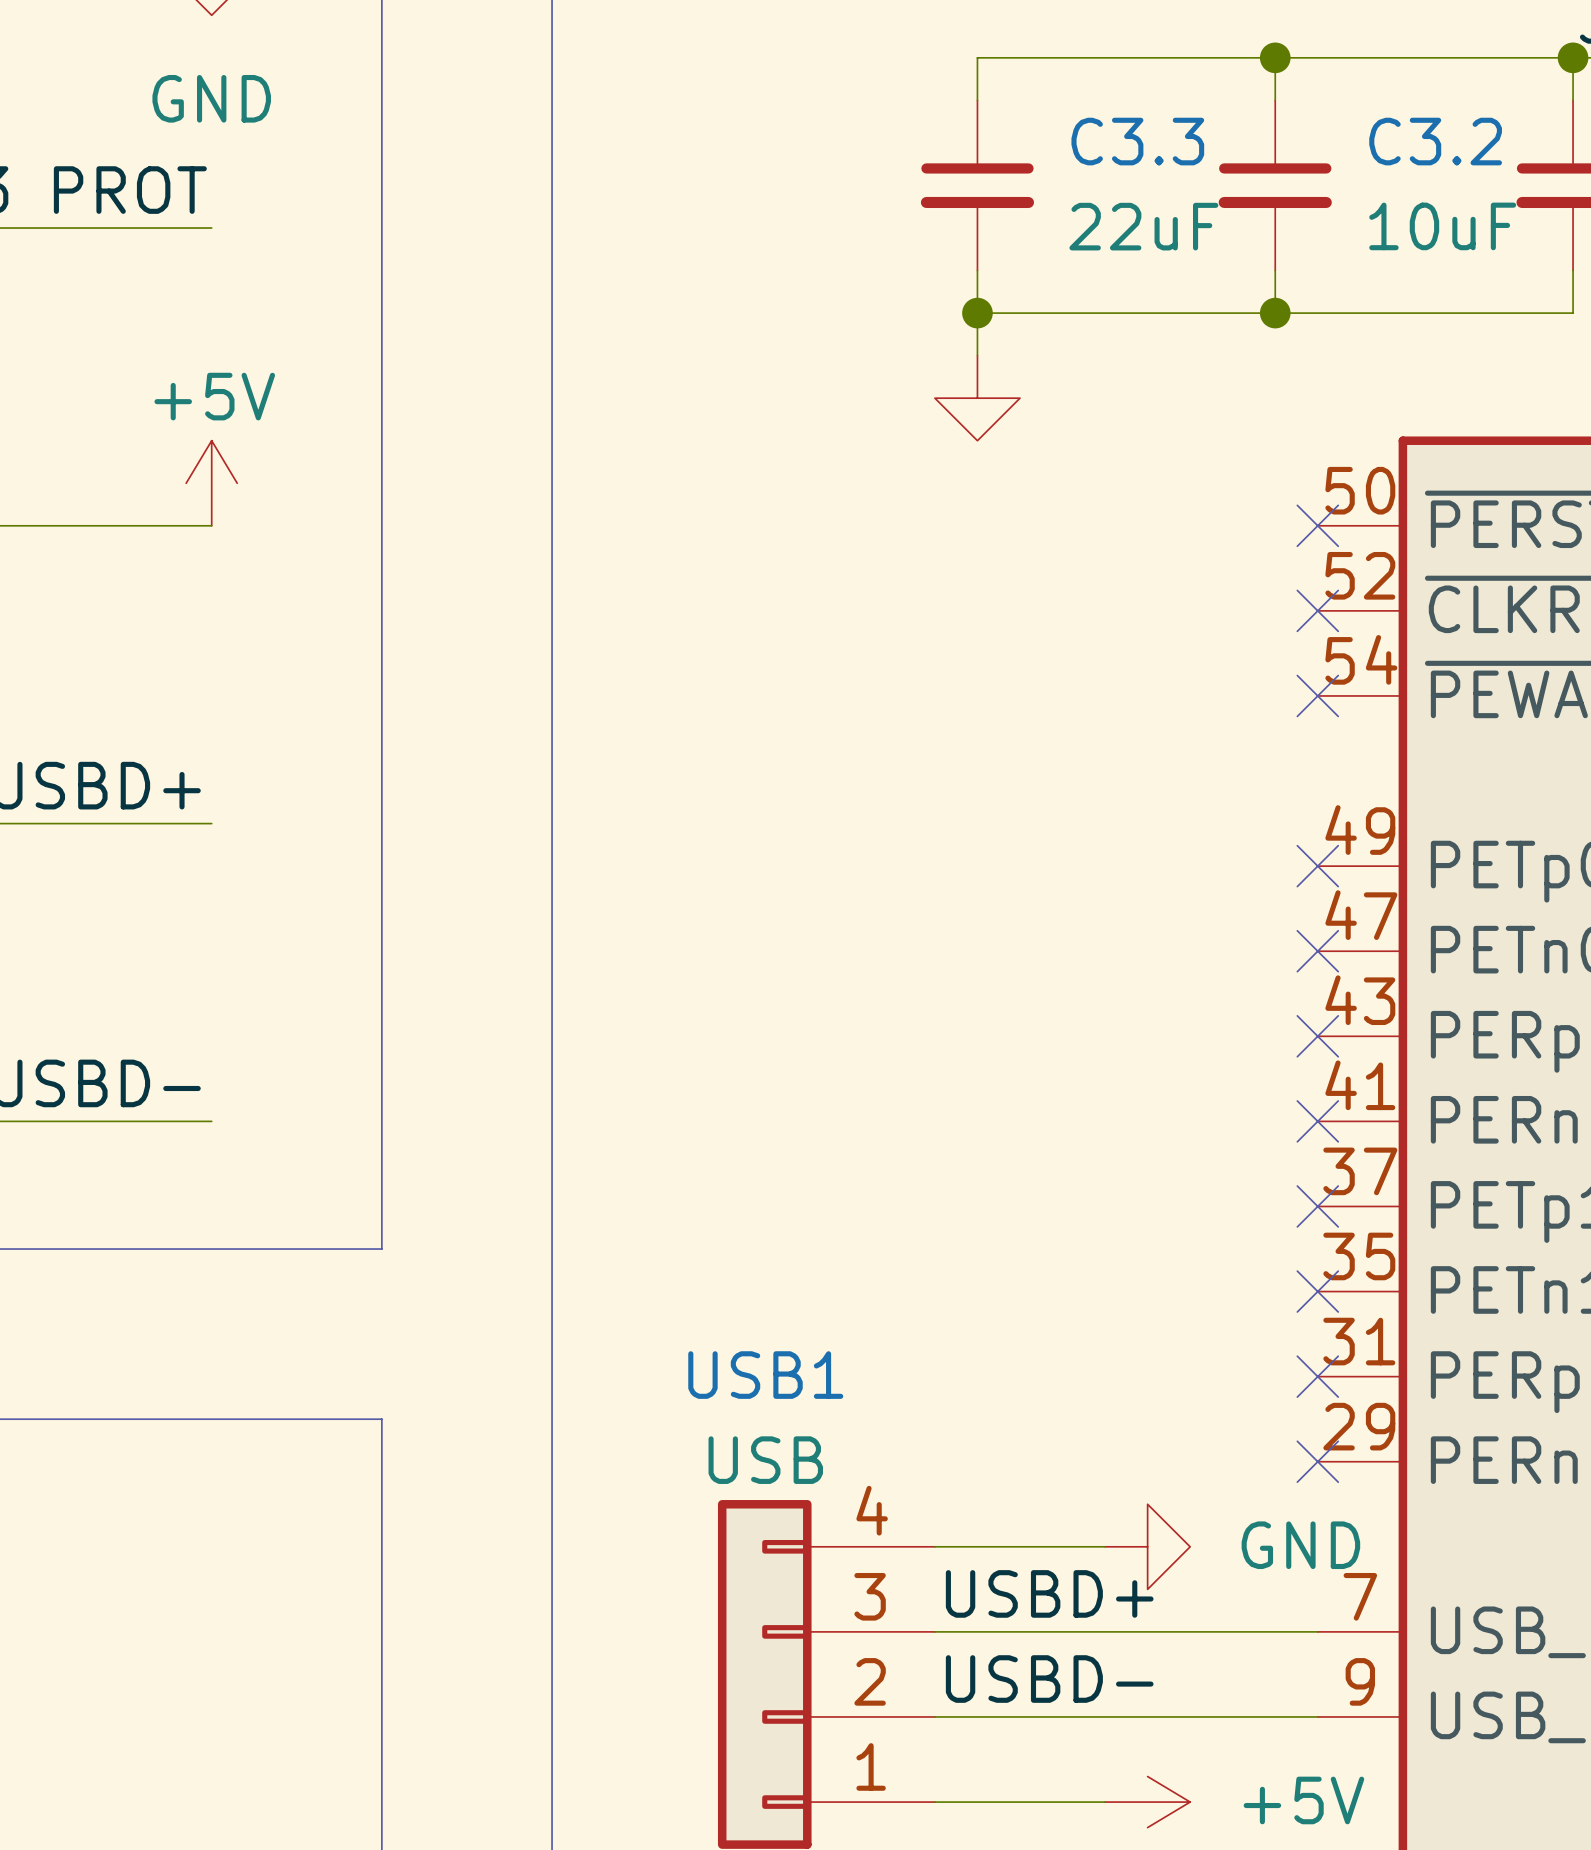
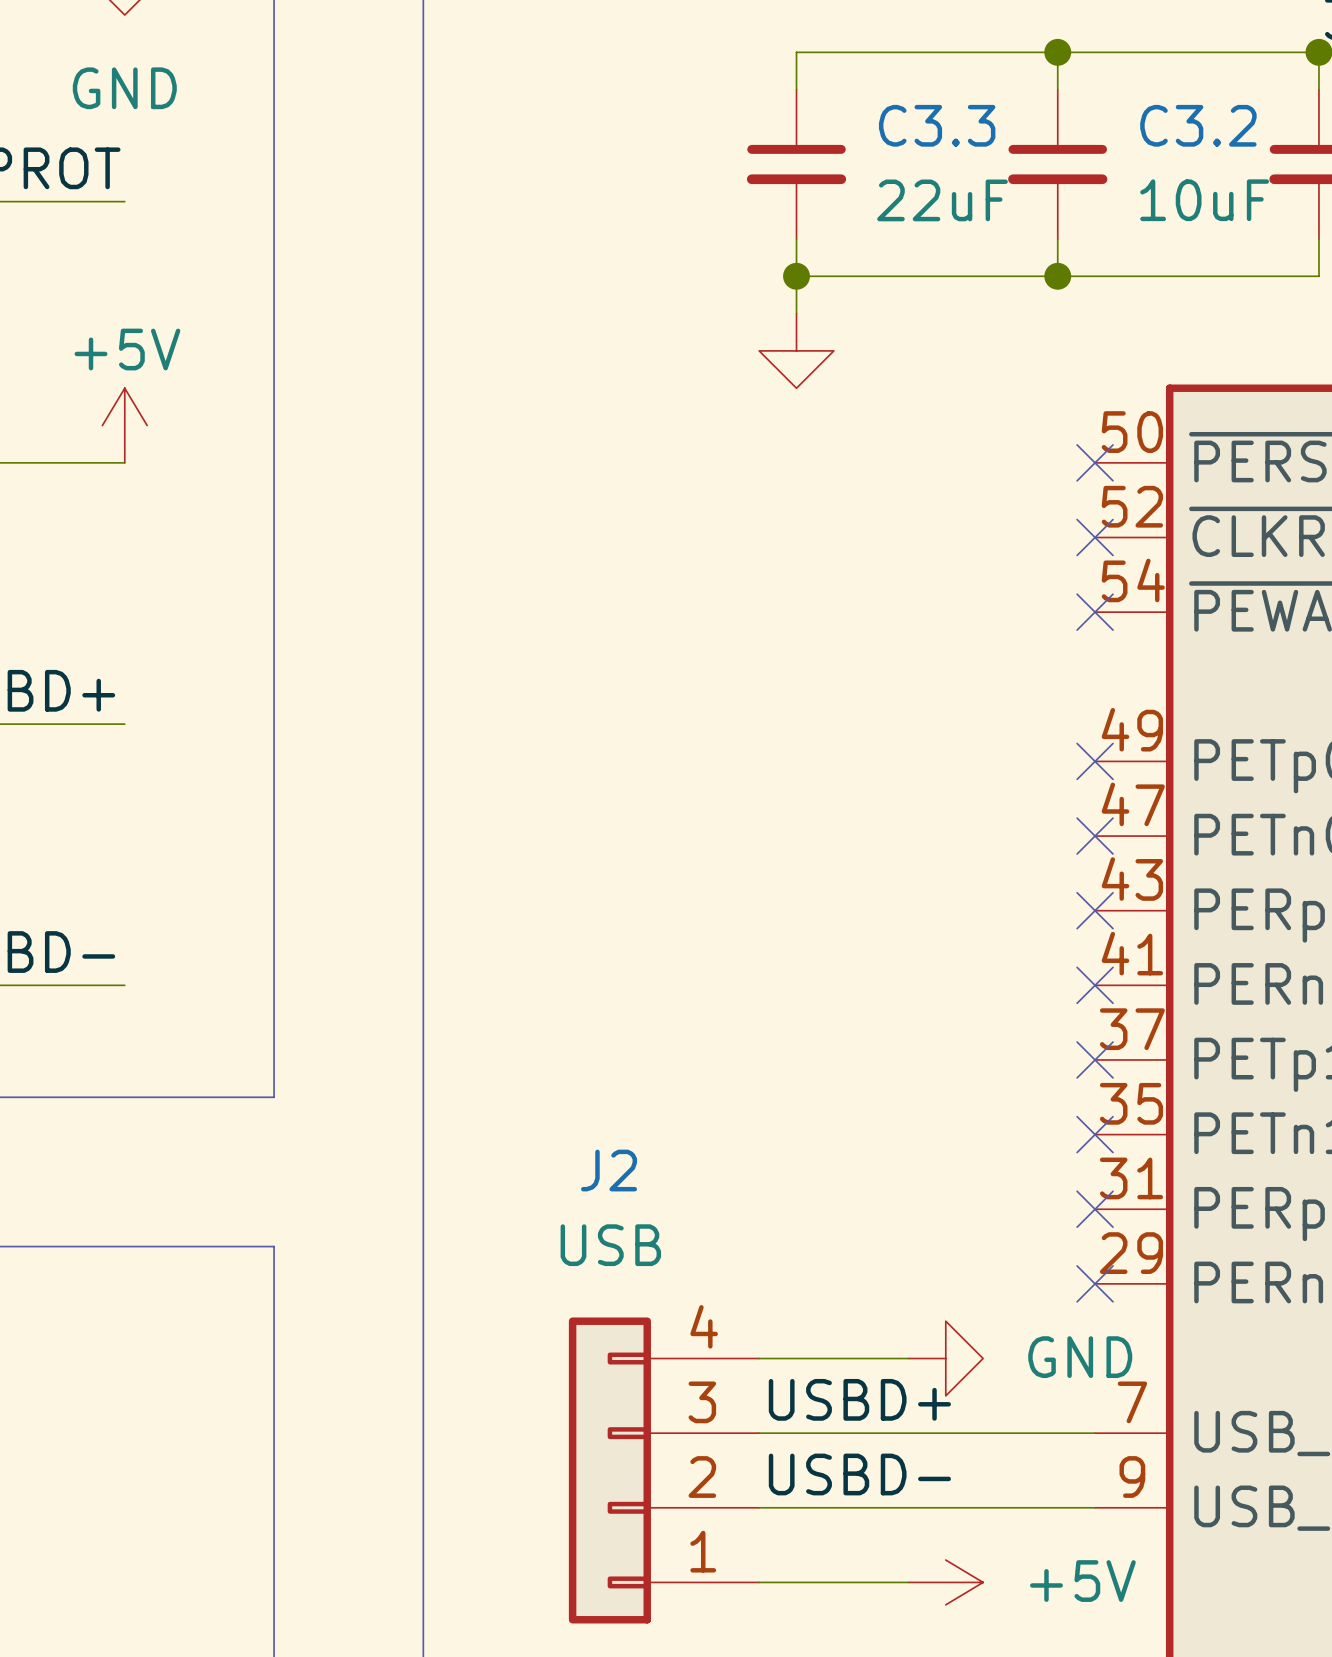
USB1 name: USB1 (765, 1375) -> J2 (609, 1170)
USB1 value position: USB (765, 1460) -> USB (610, 1245)

